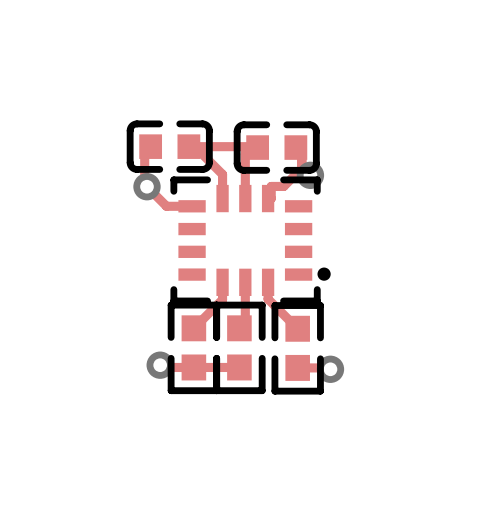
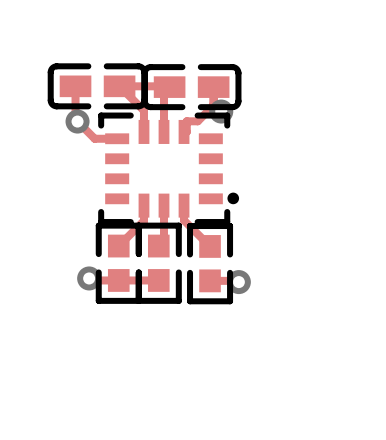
part footprint: [126, 120, 213, 173] -> [47, 63, 148, 110]
part footprint: [233, 121, 320, 174] -> [141, 64, 242, 111]

